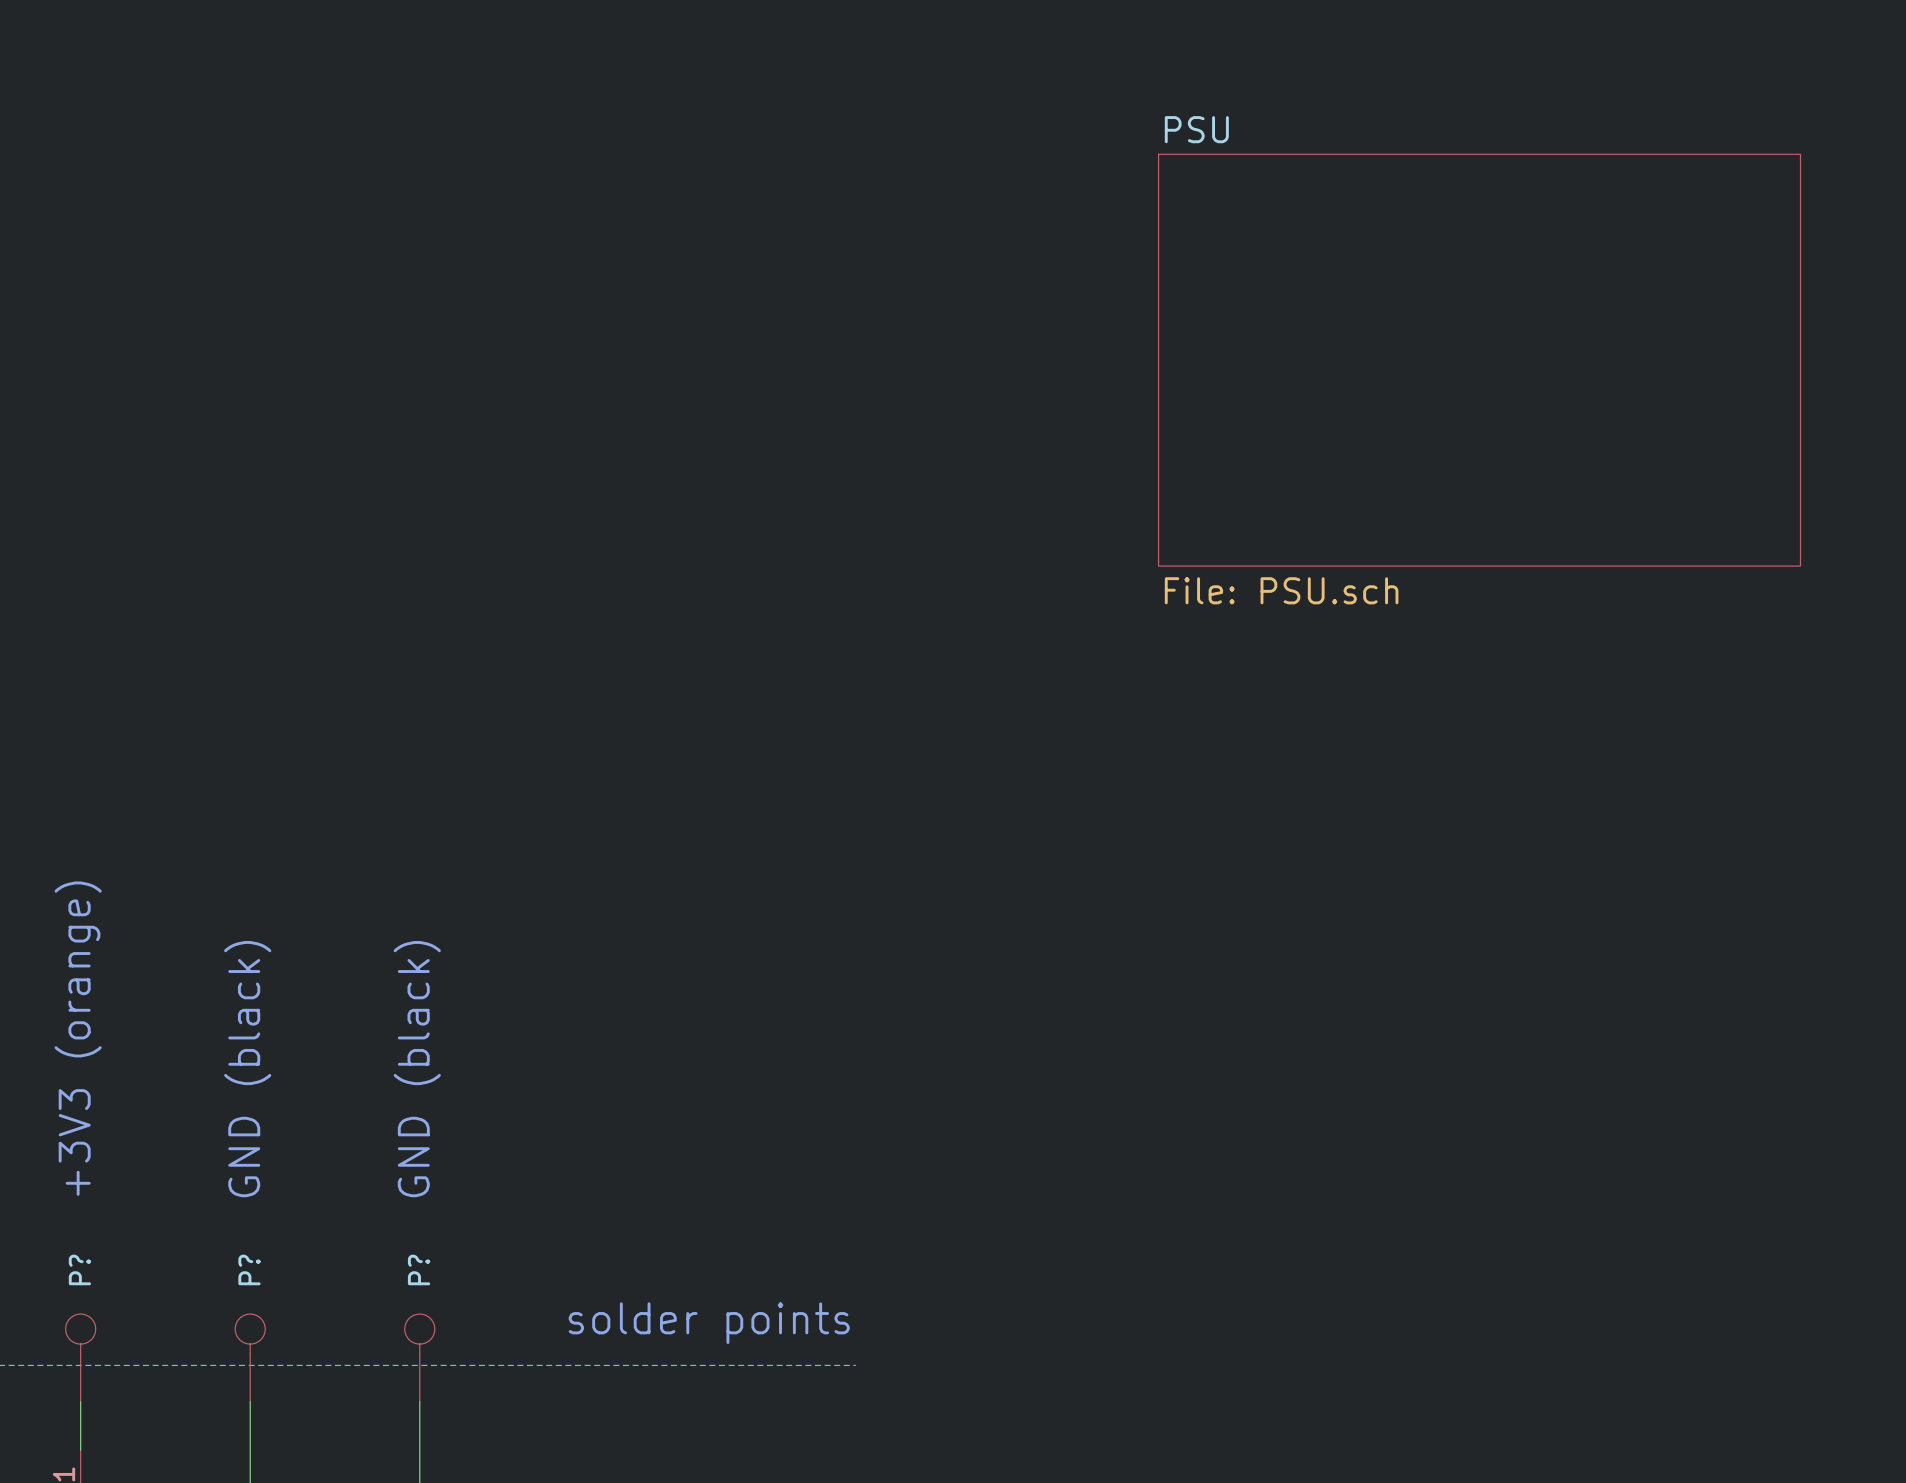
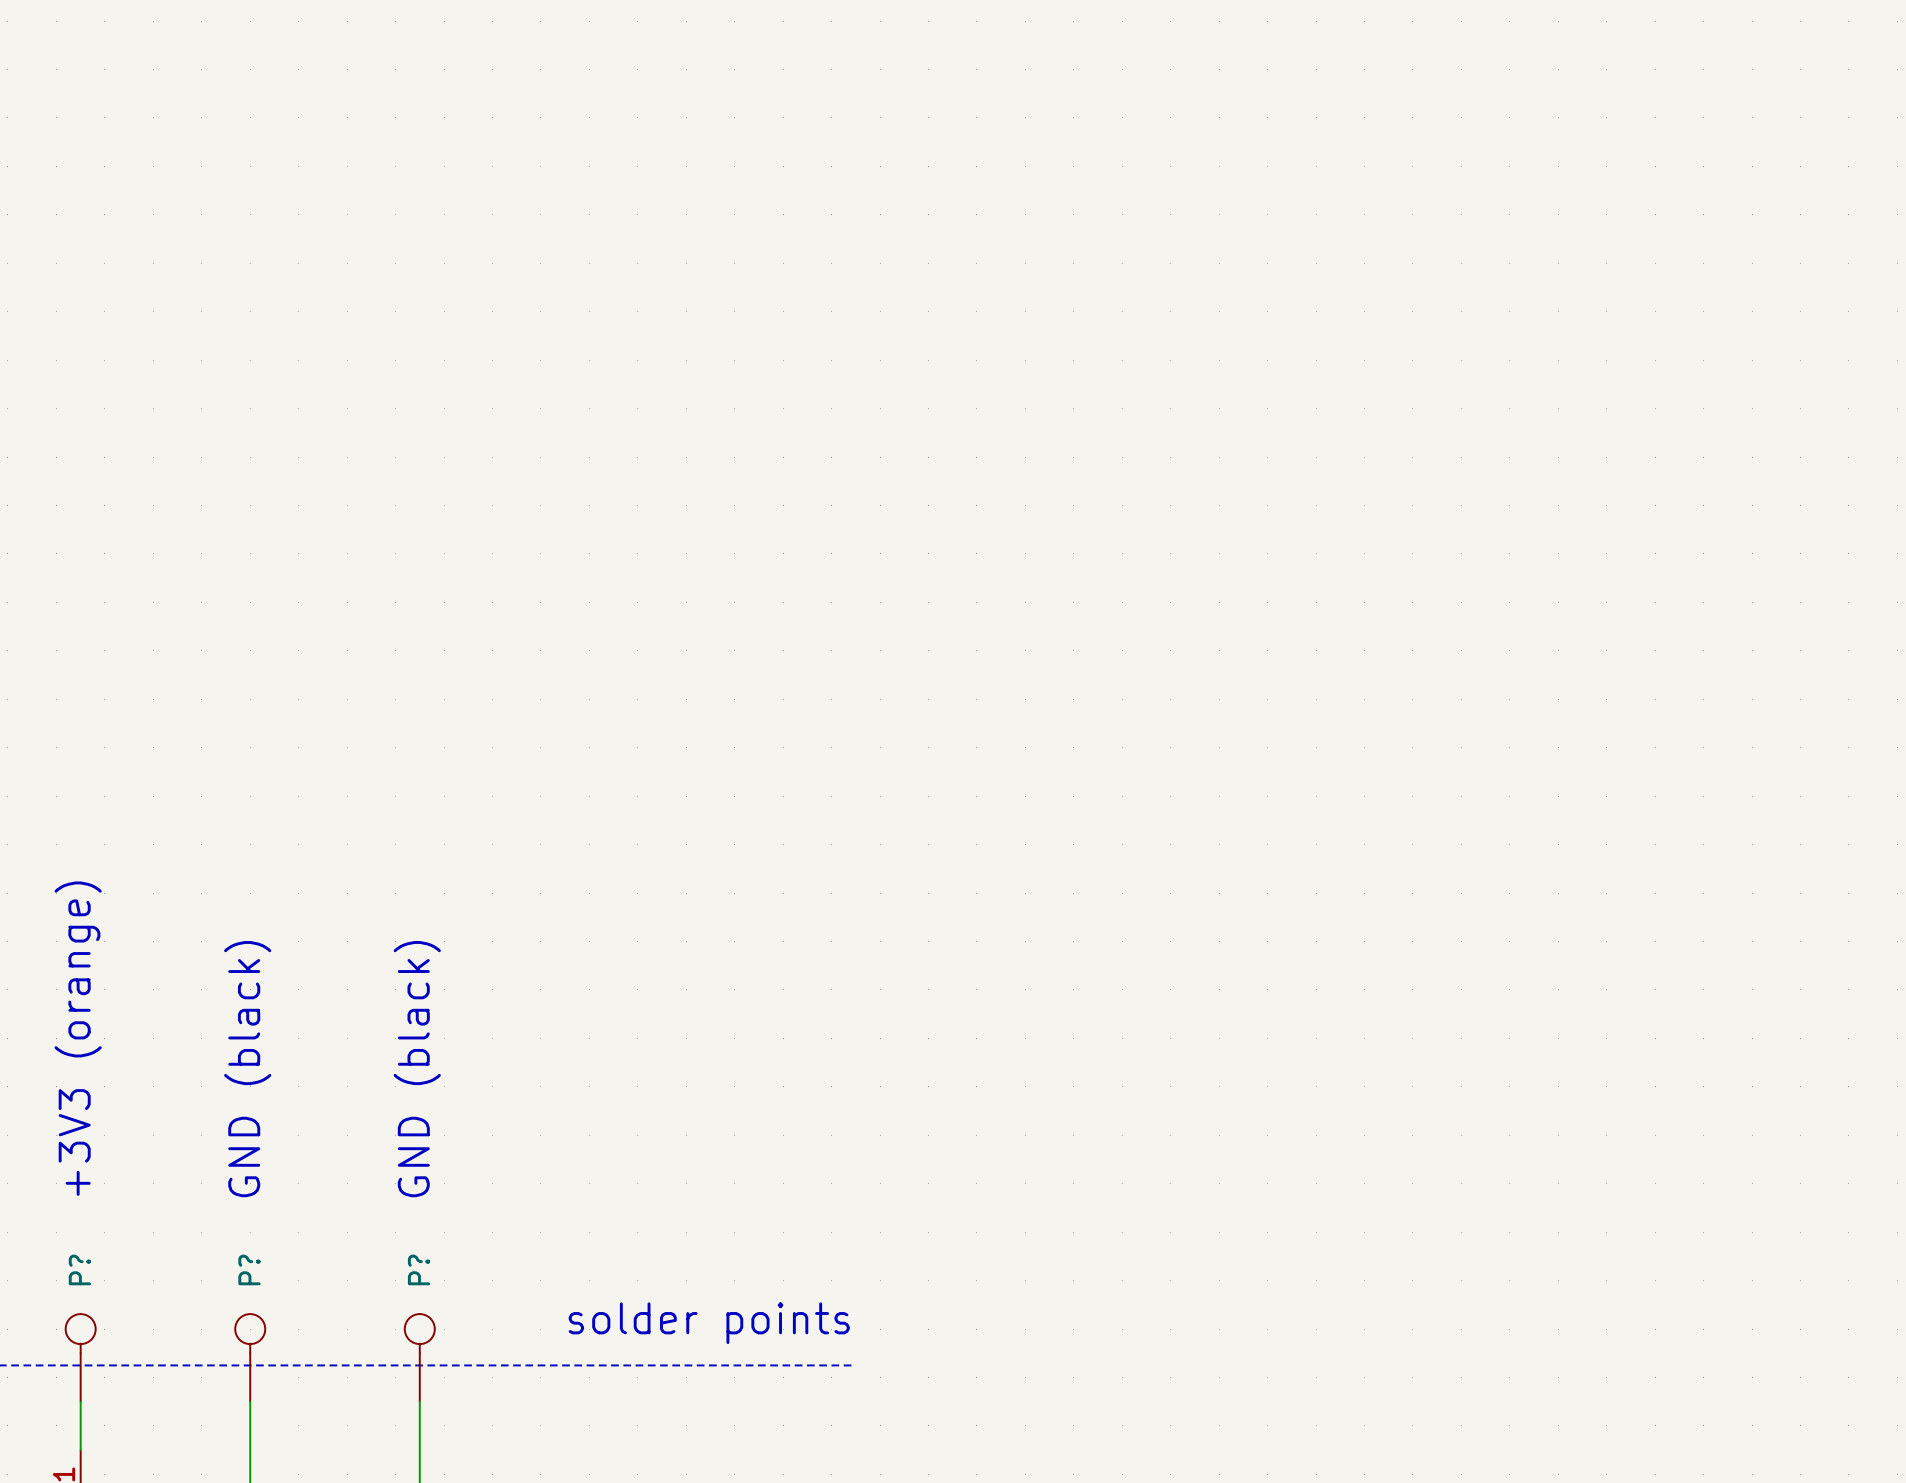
sheet PSU: File: PSU.sch (1479, 360) -> none

